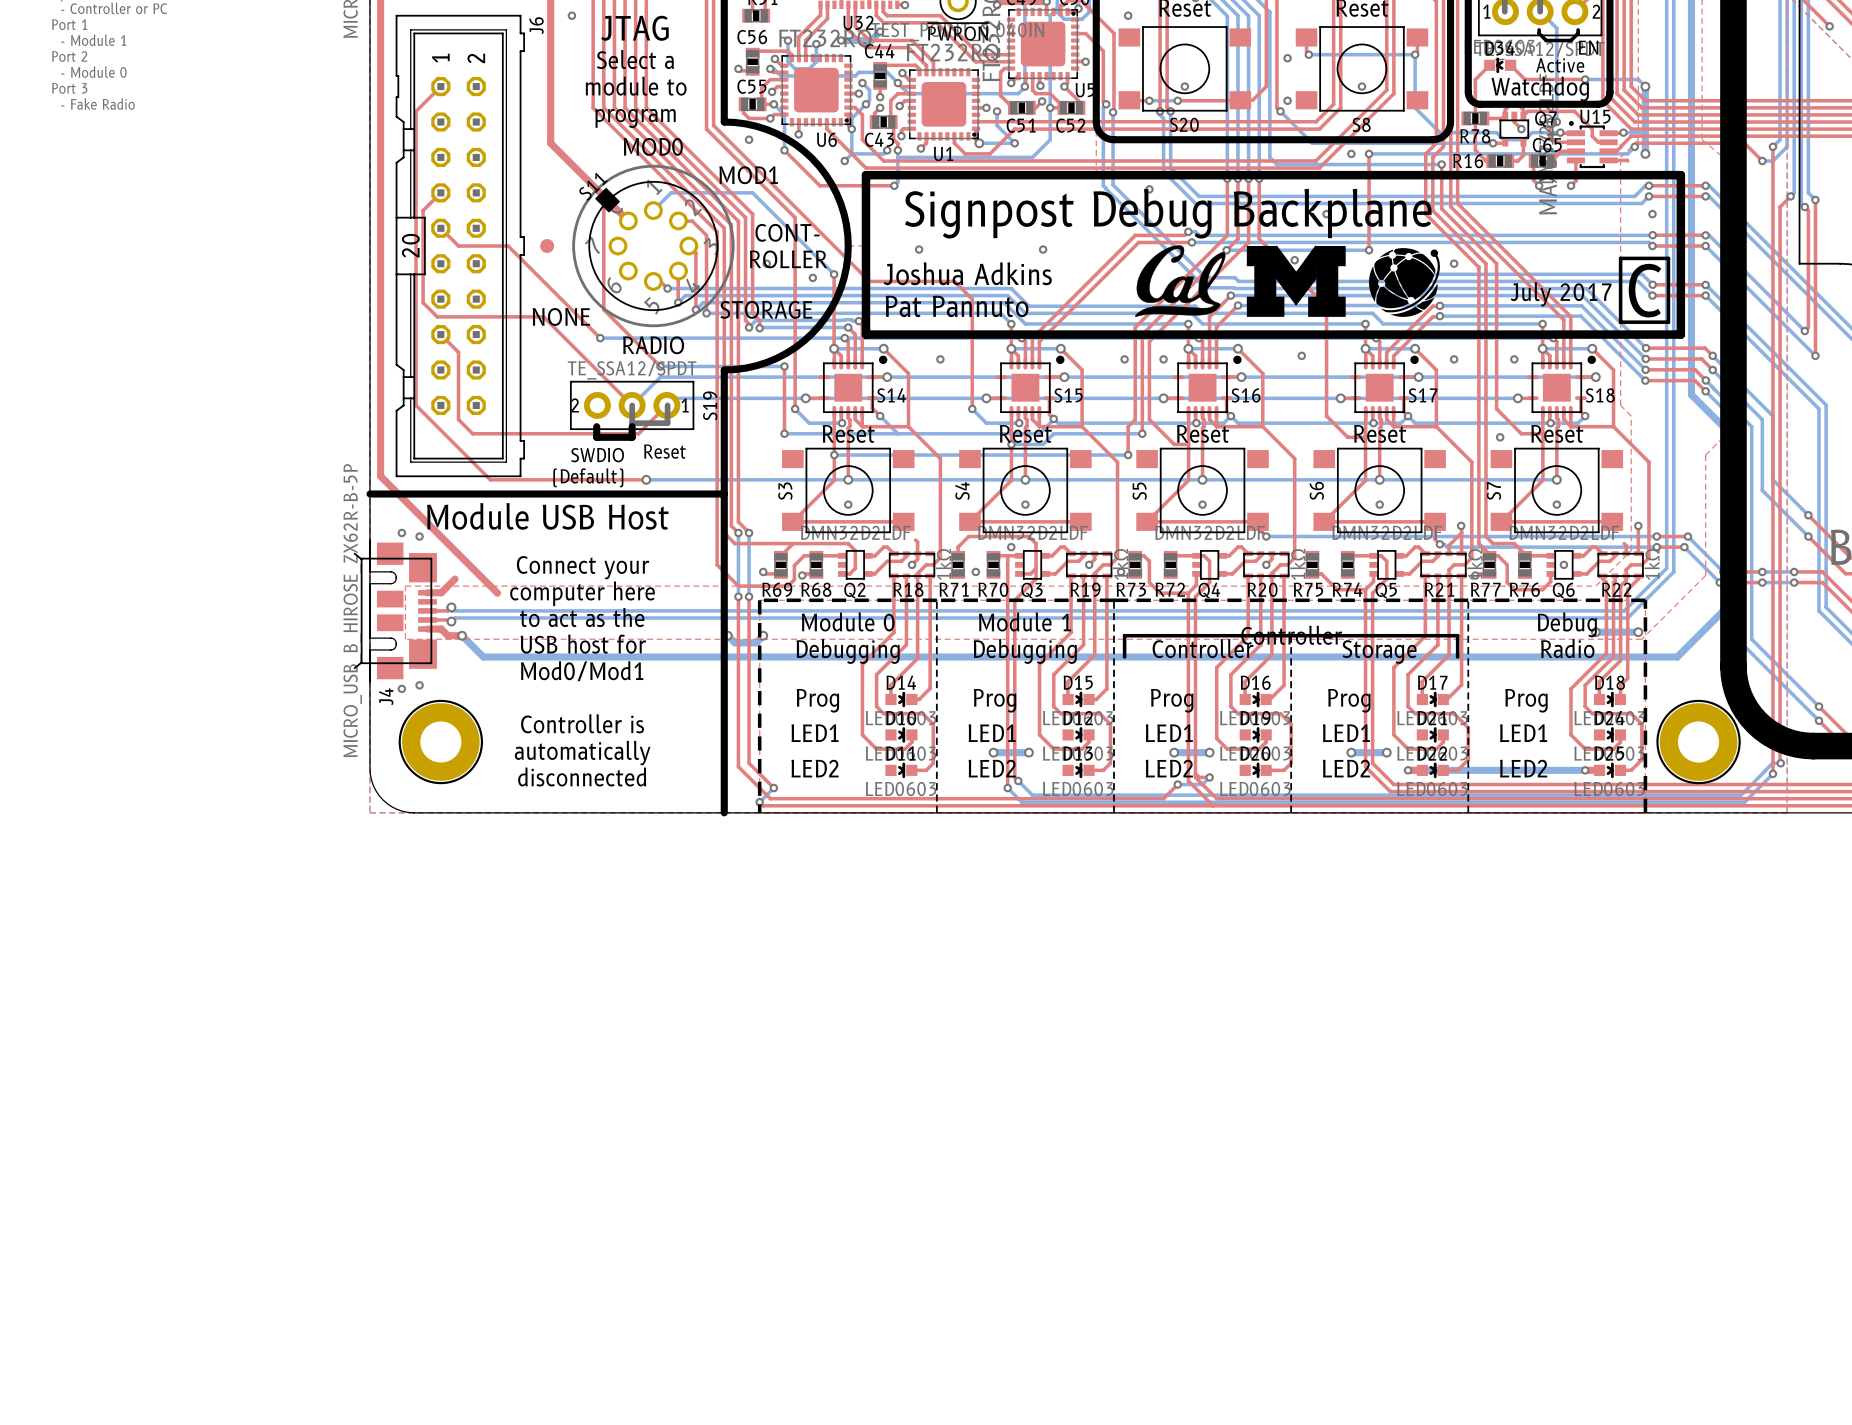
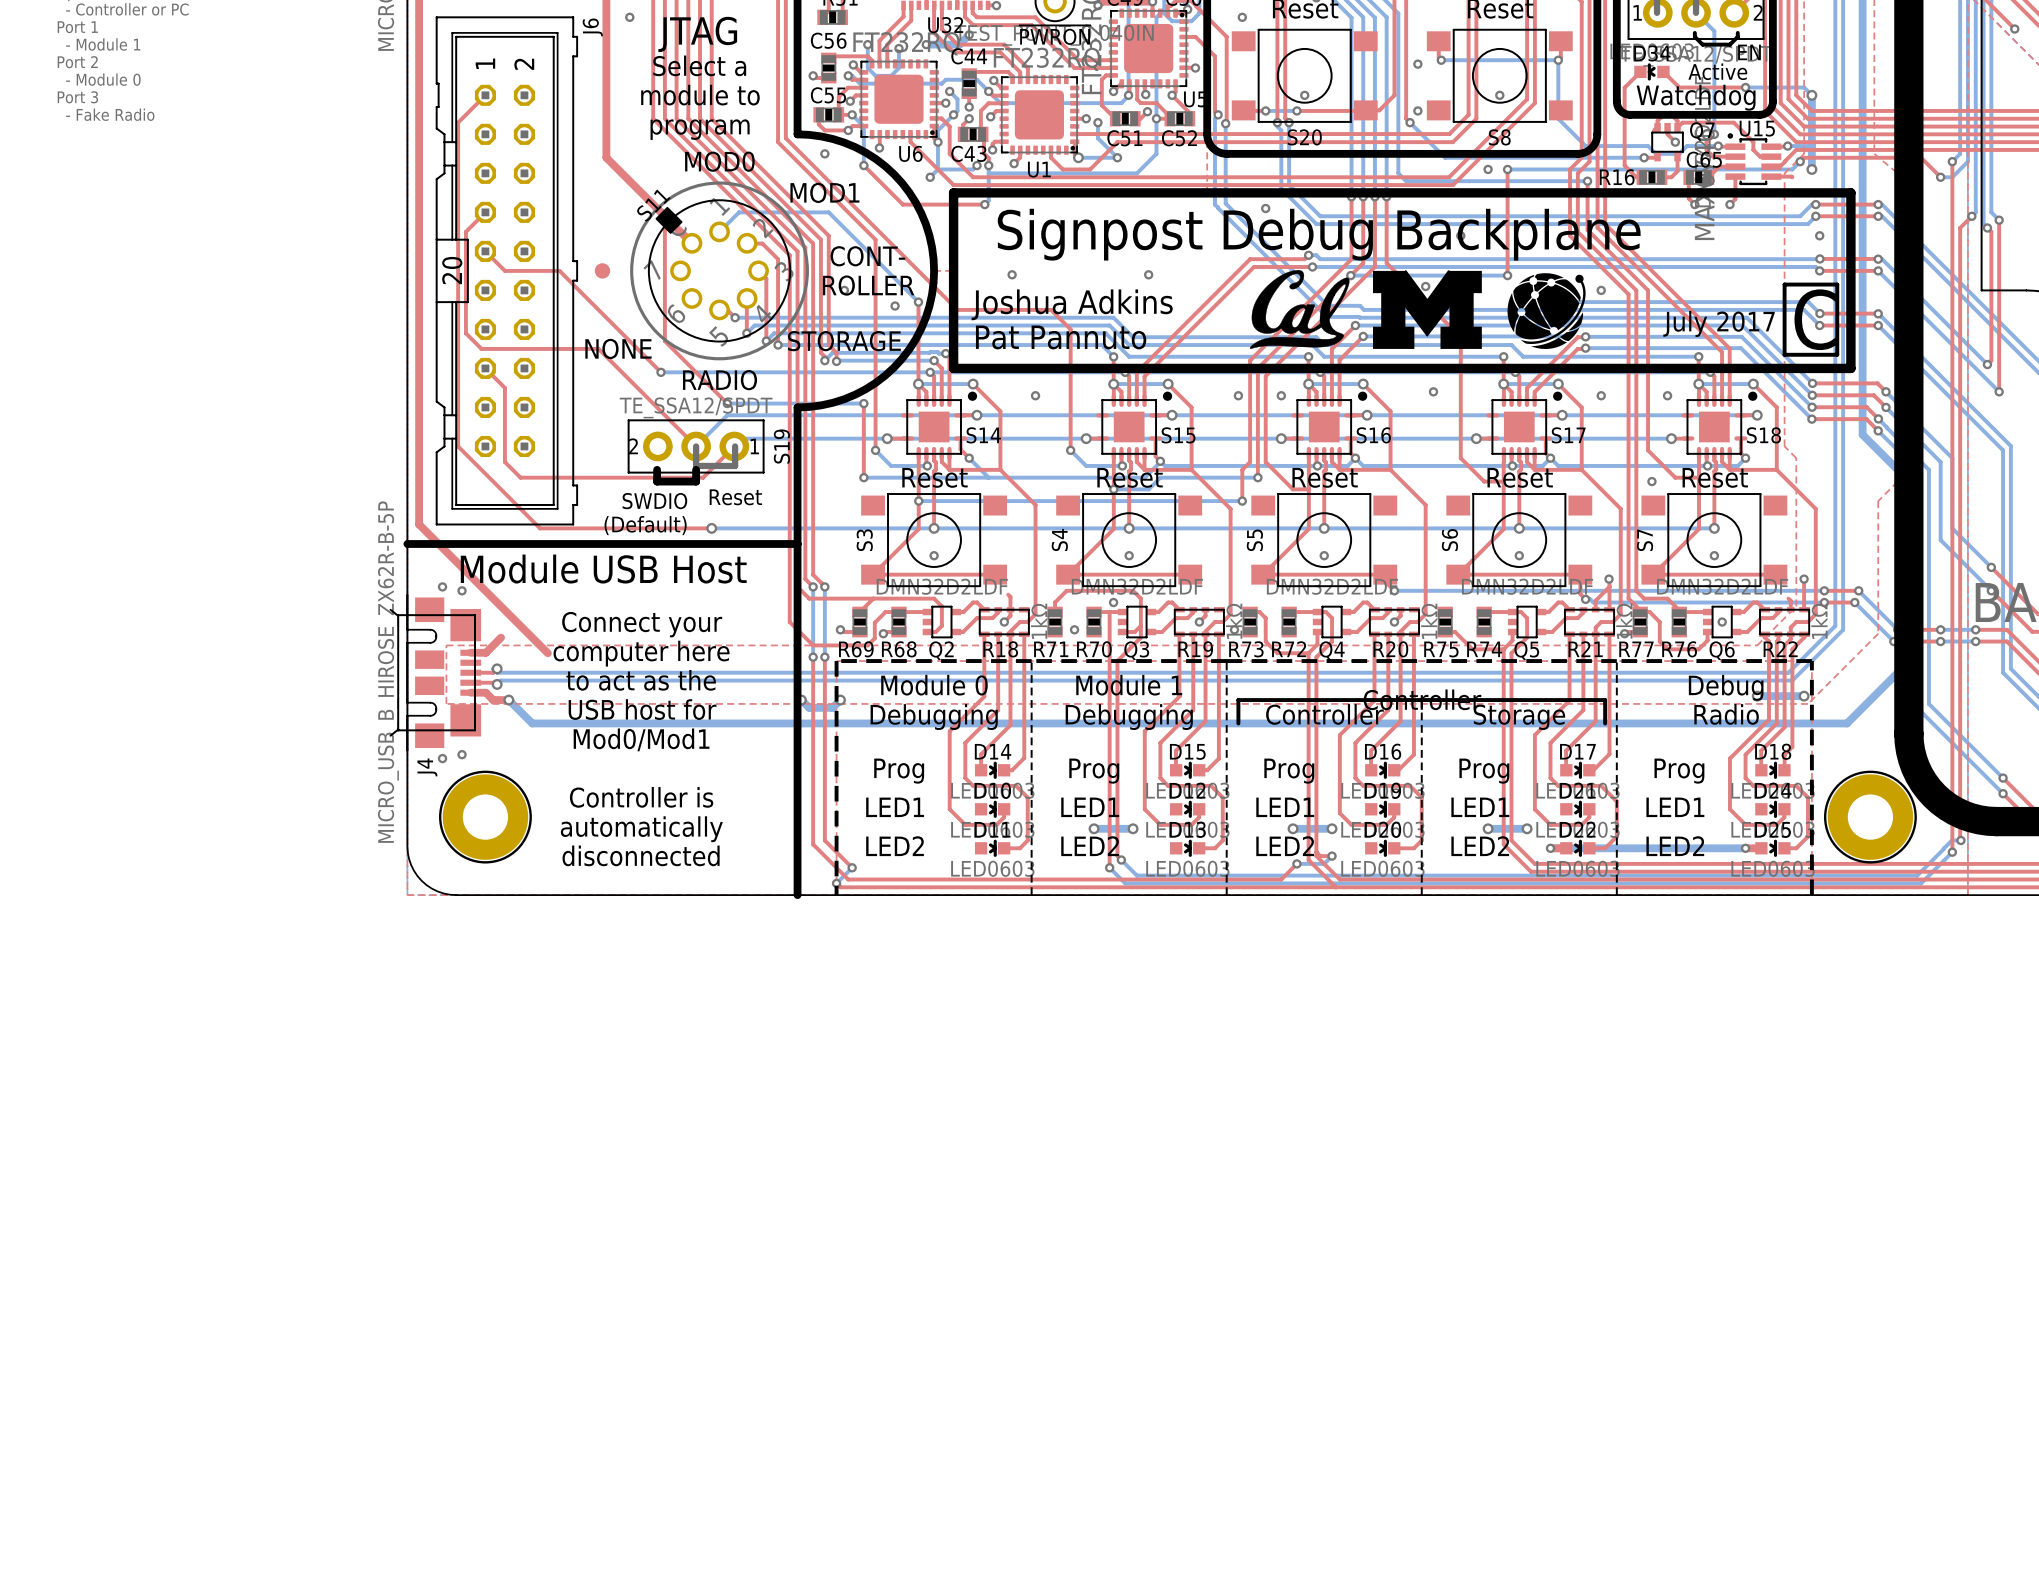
R78: (1475, 118) -> none
top track: (1484, 118) (1502, 118) -> none

